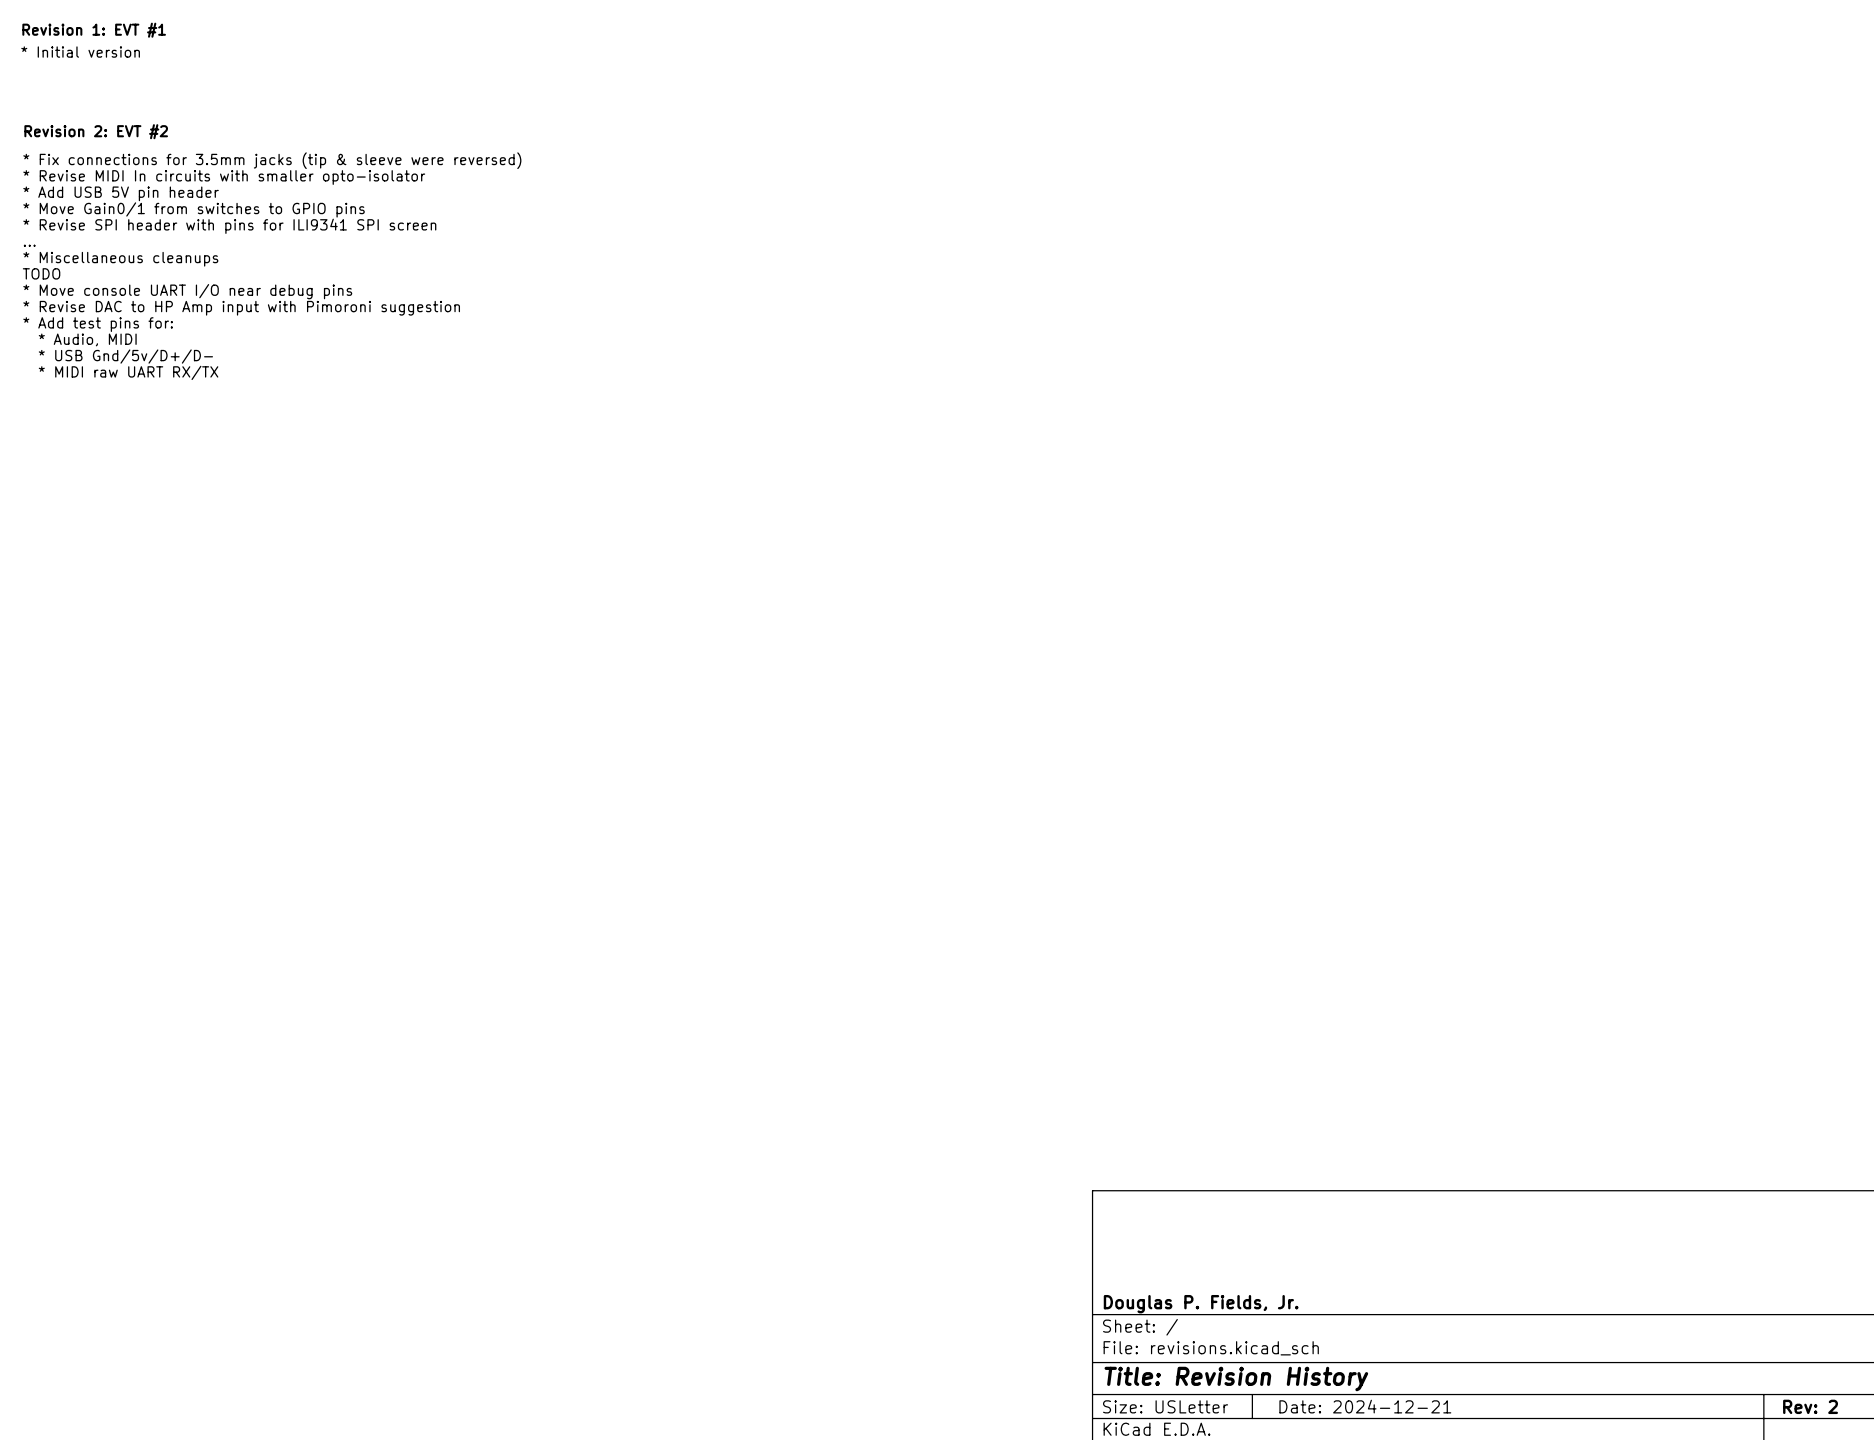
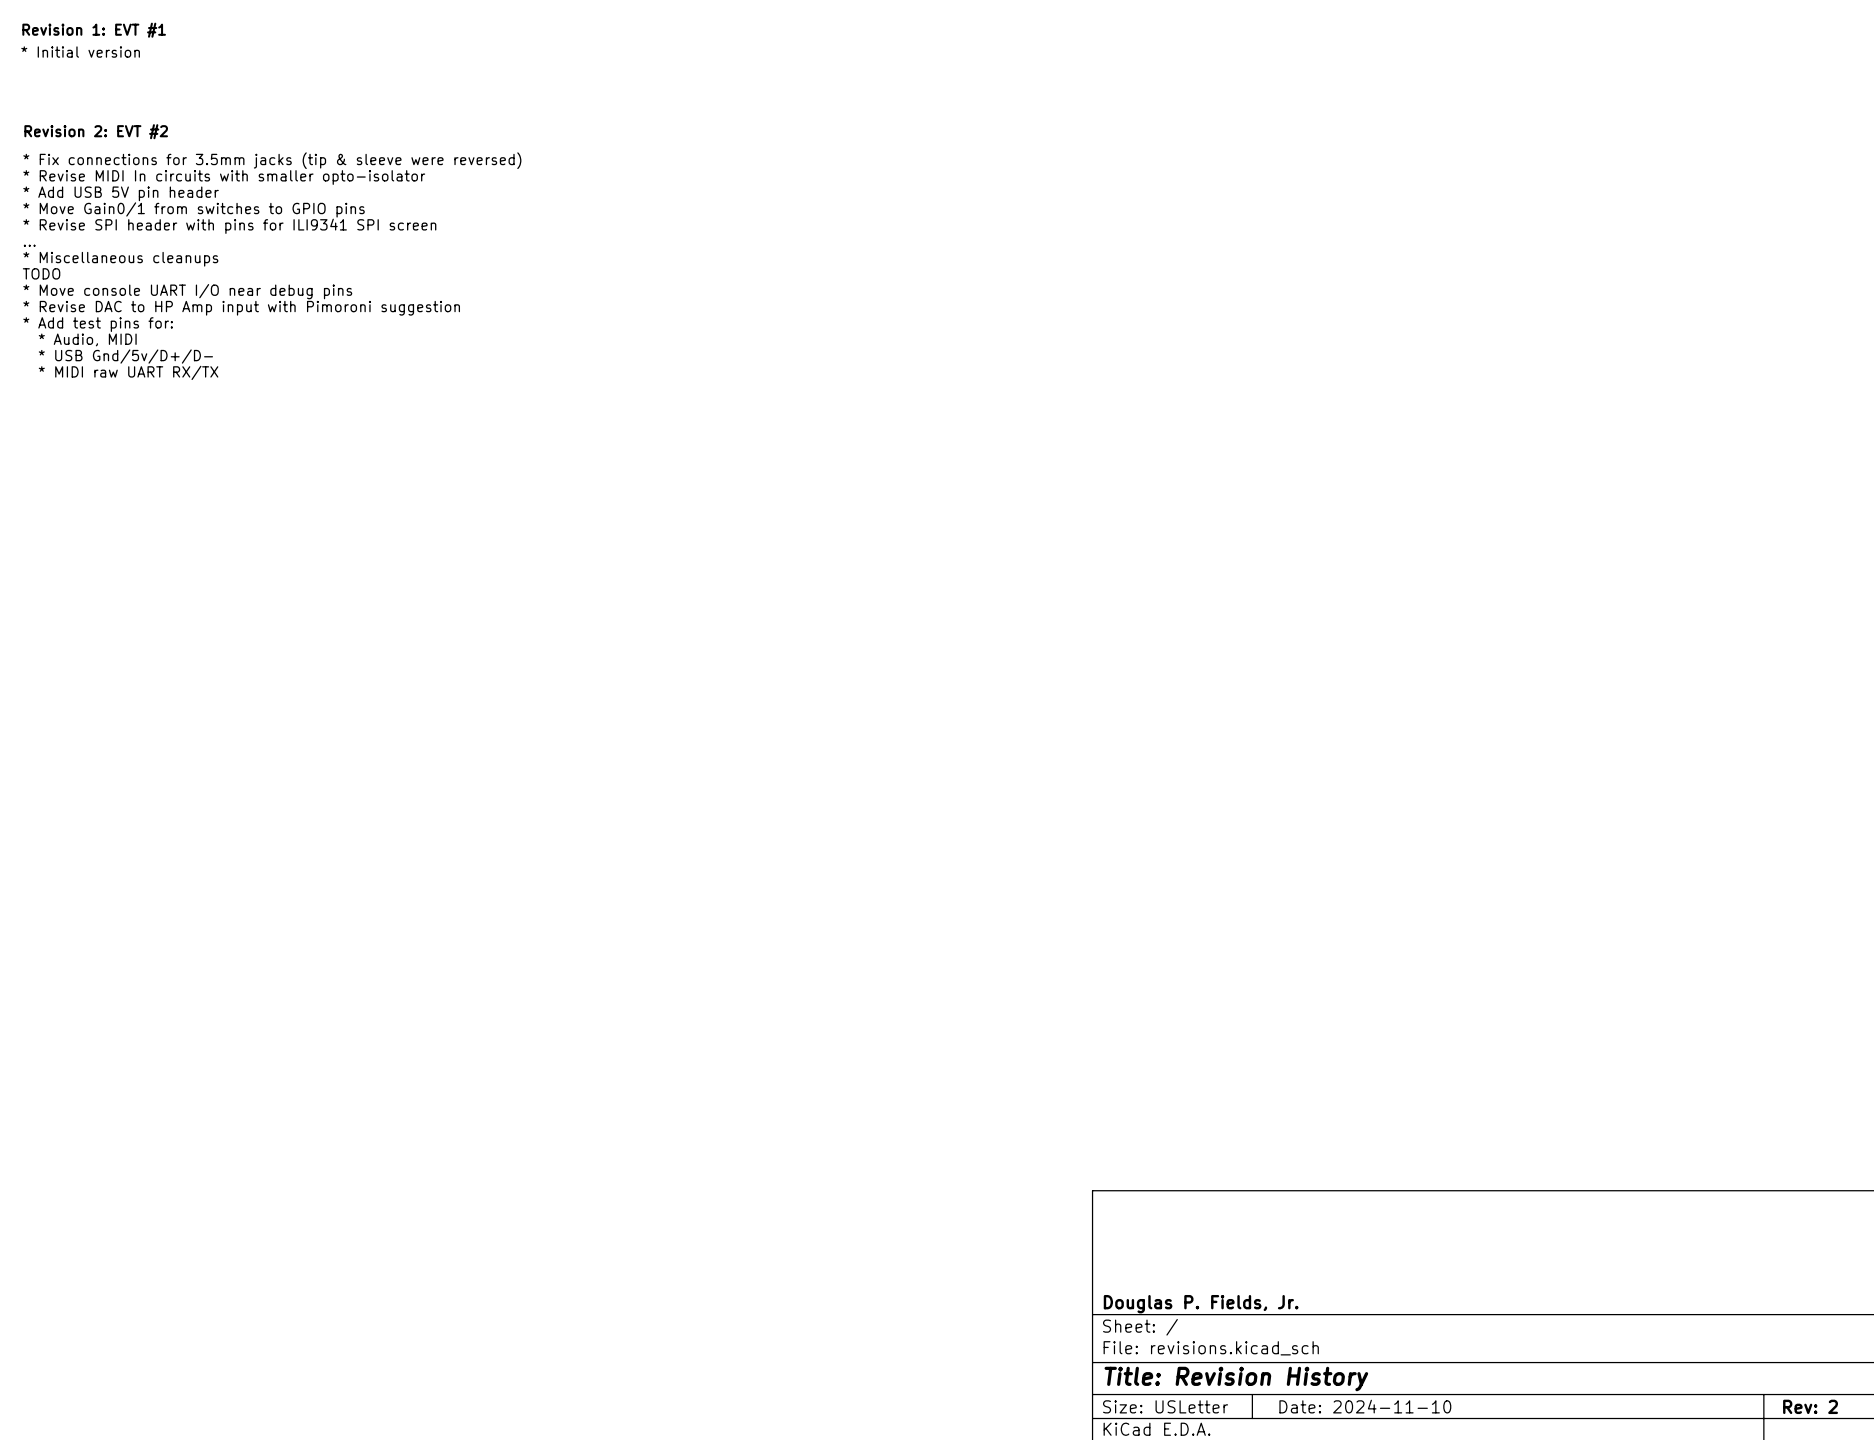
title block: Date: 2024-12-21 (1365, 1406) -> Date: 2024-11-10 (1365, 1406)

